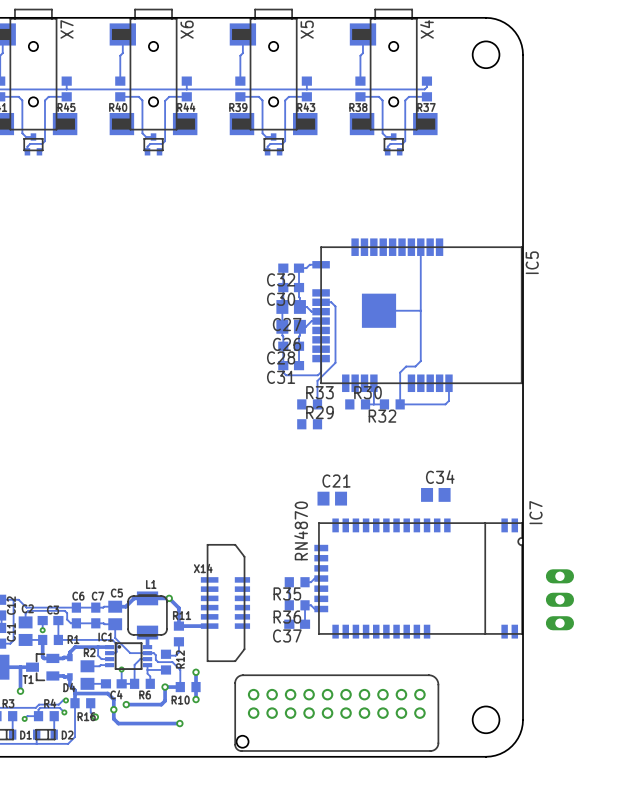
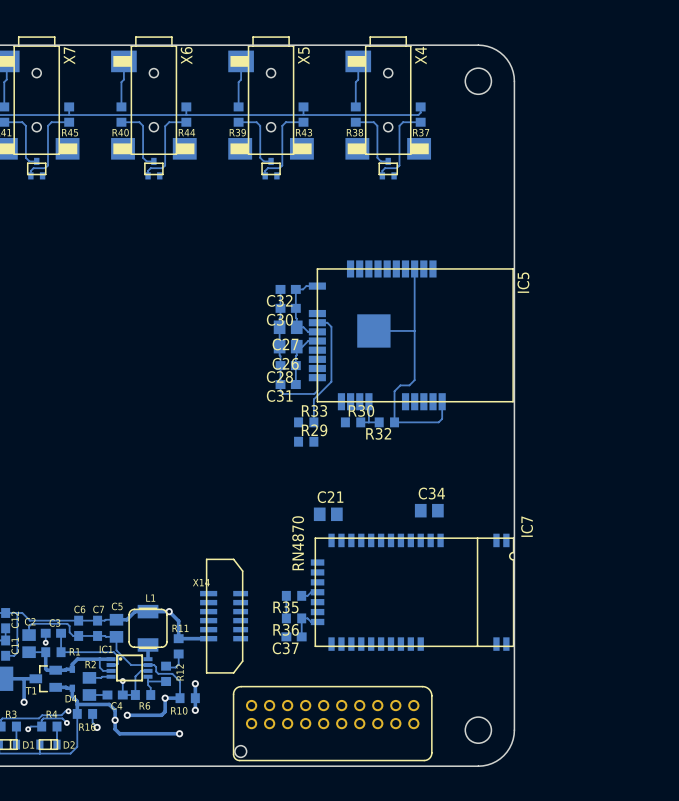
part: (559, 599) -> none

